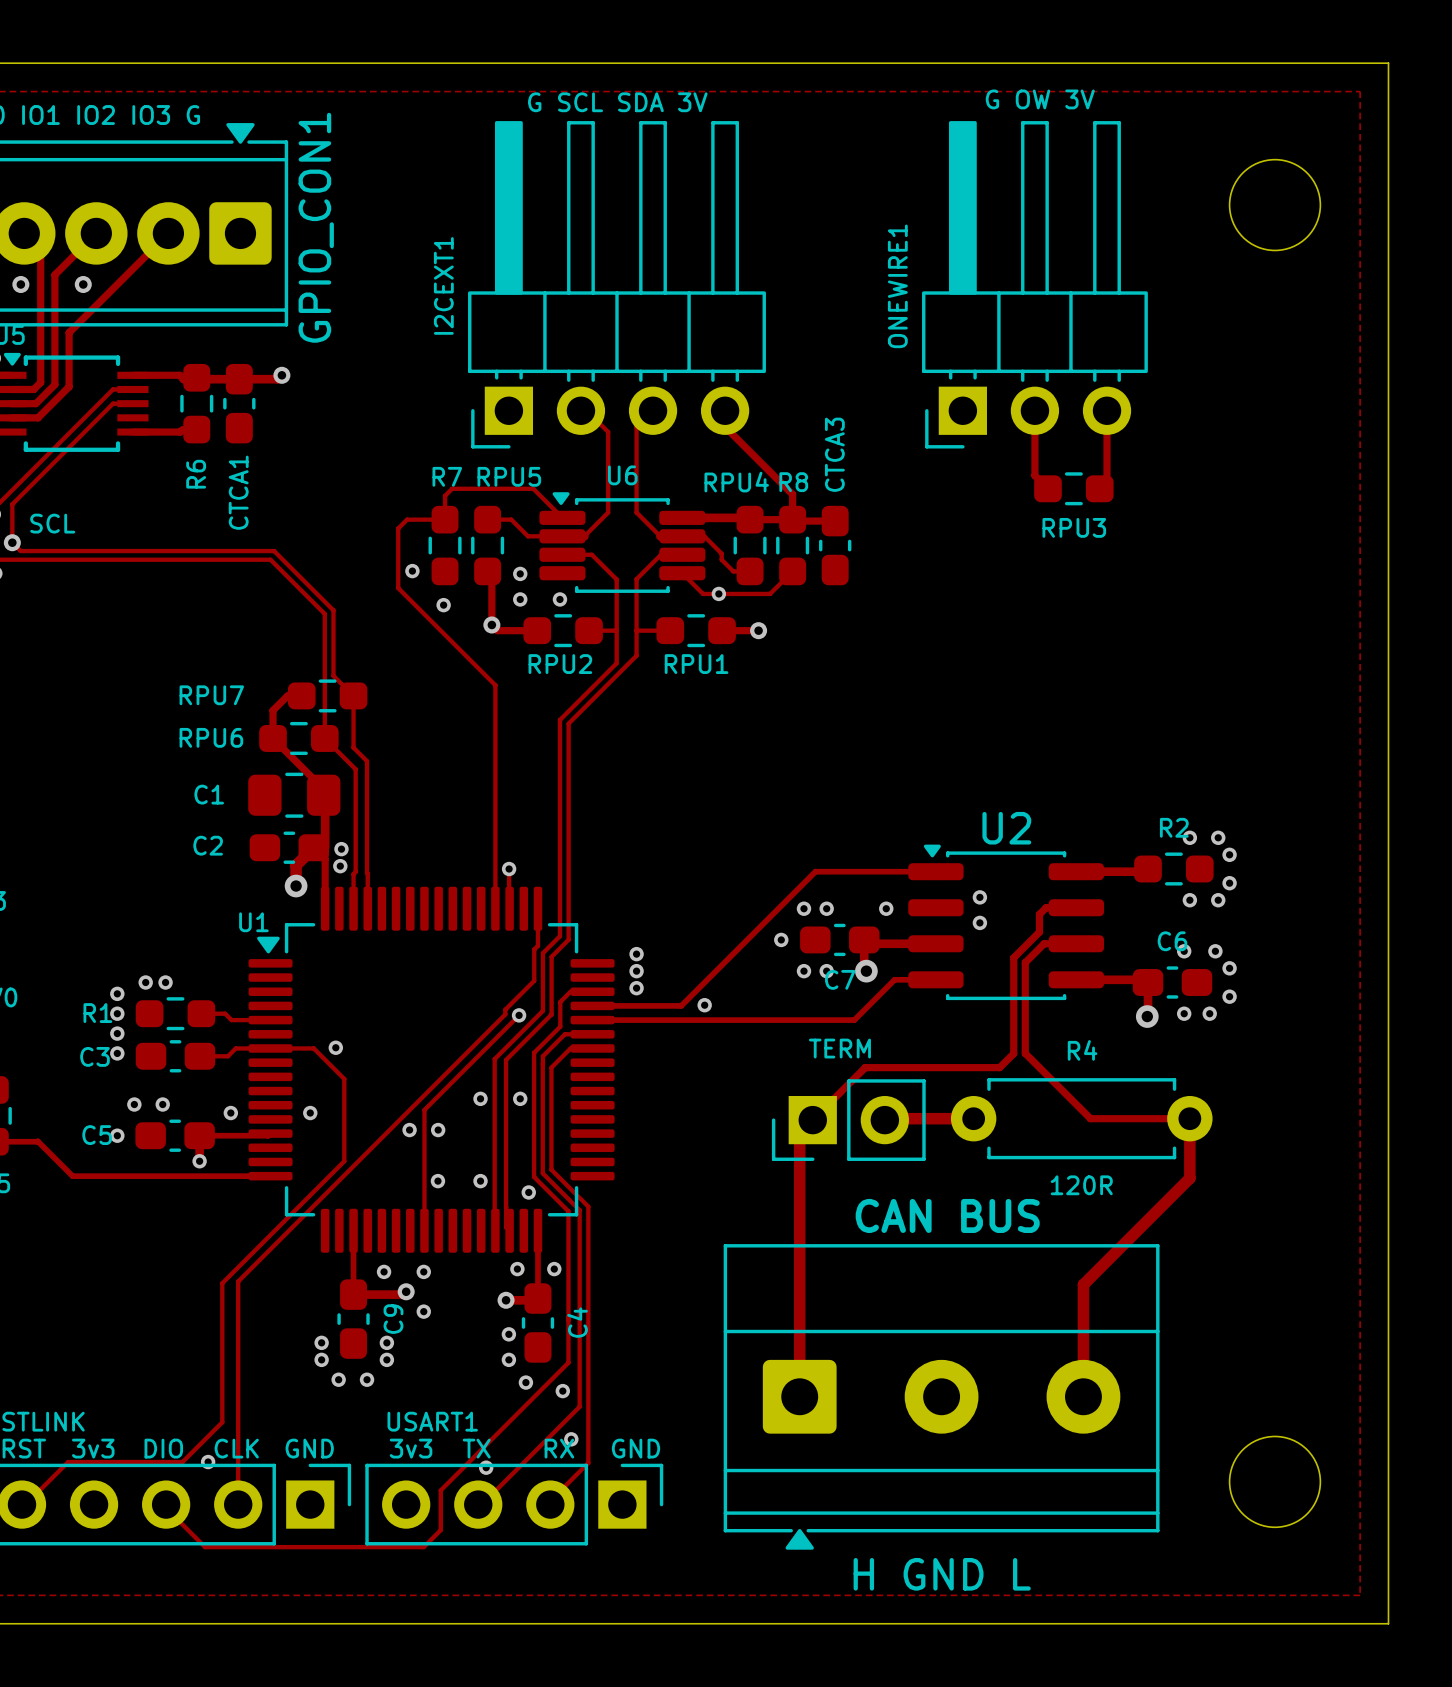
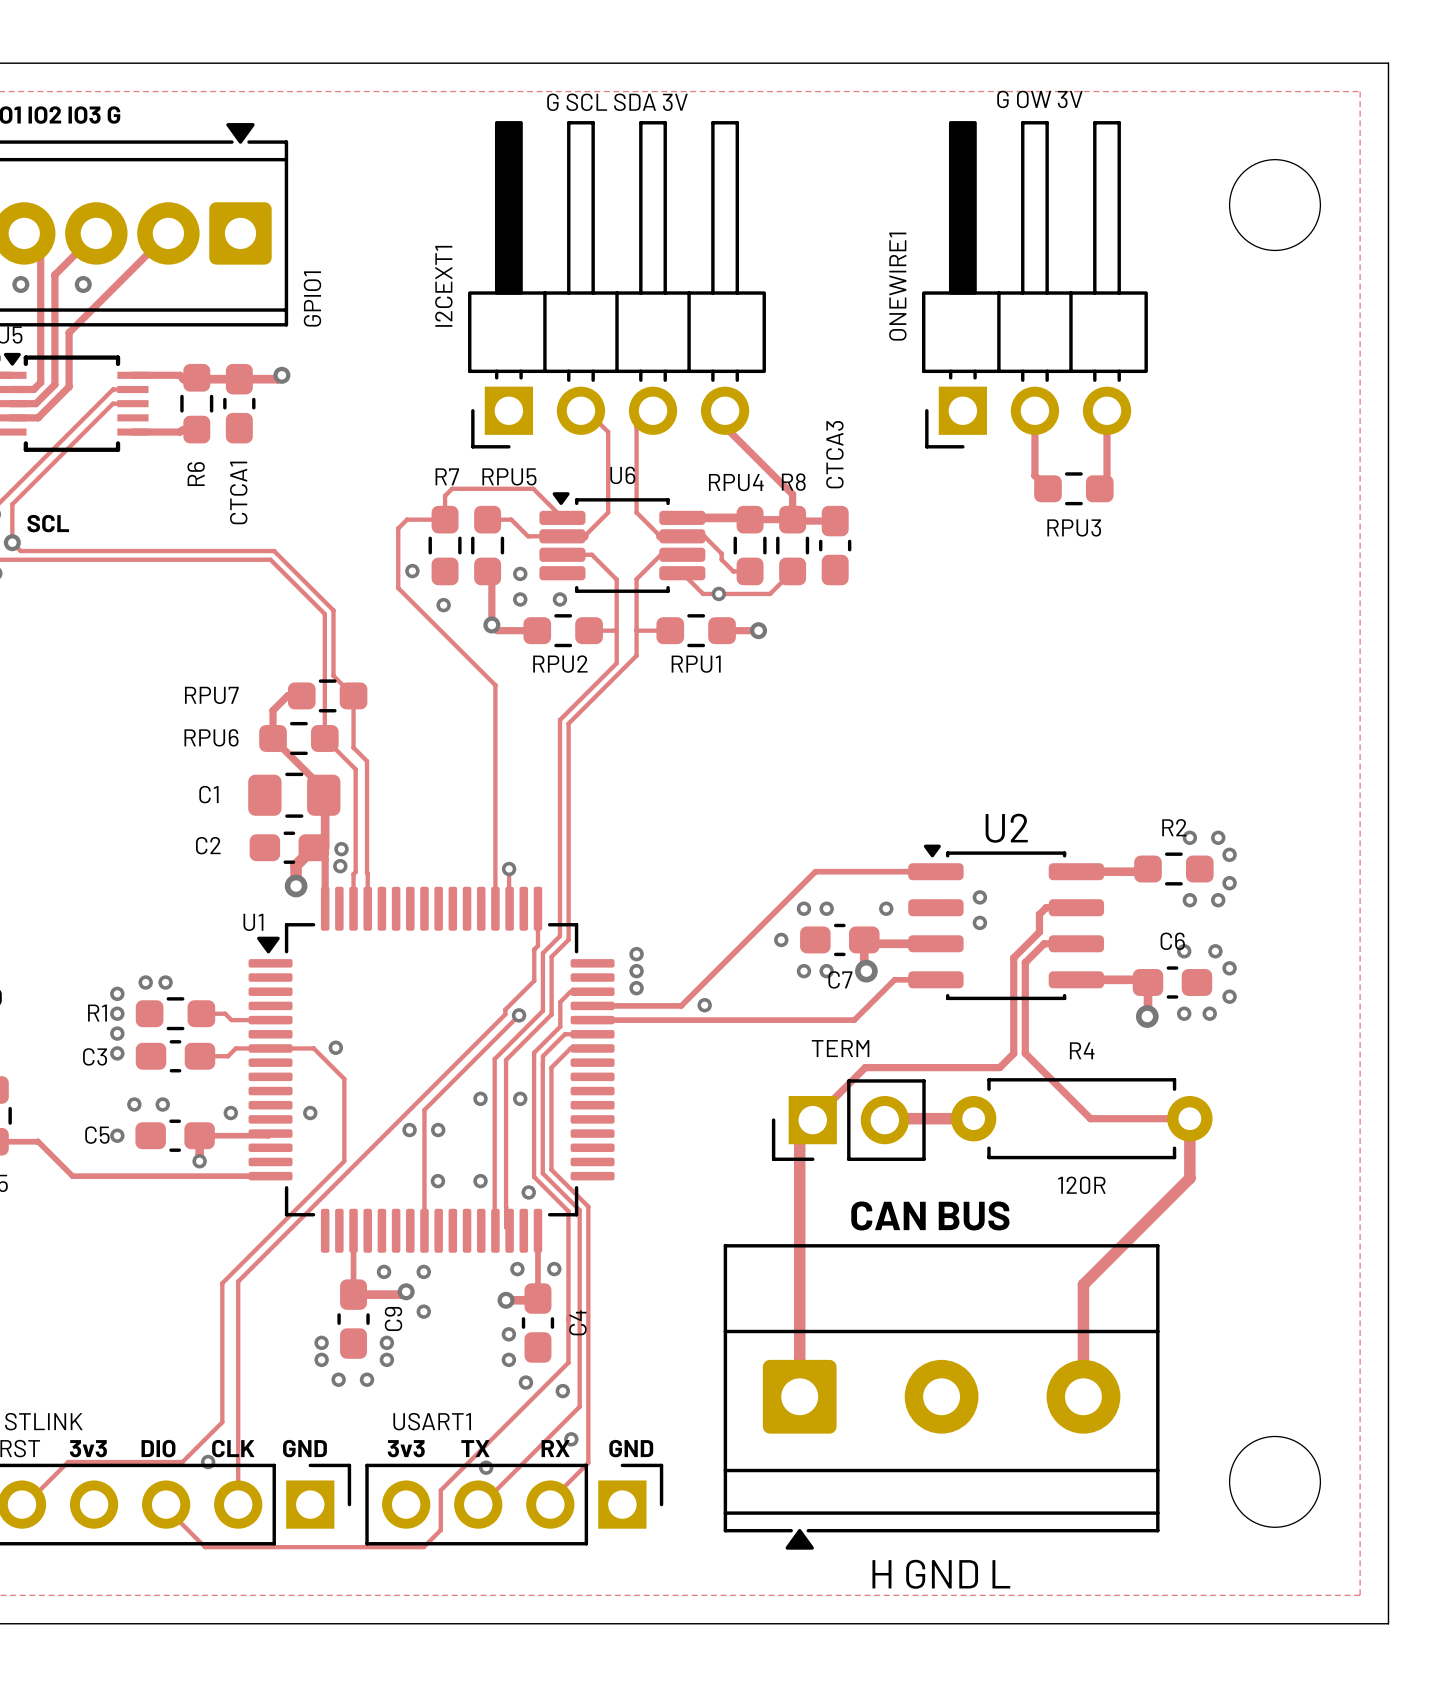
GPIO_CON1 name: GPIO_CON1 (316, 227) -> GPIO1 (312, 298)

